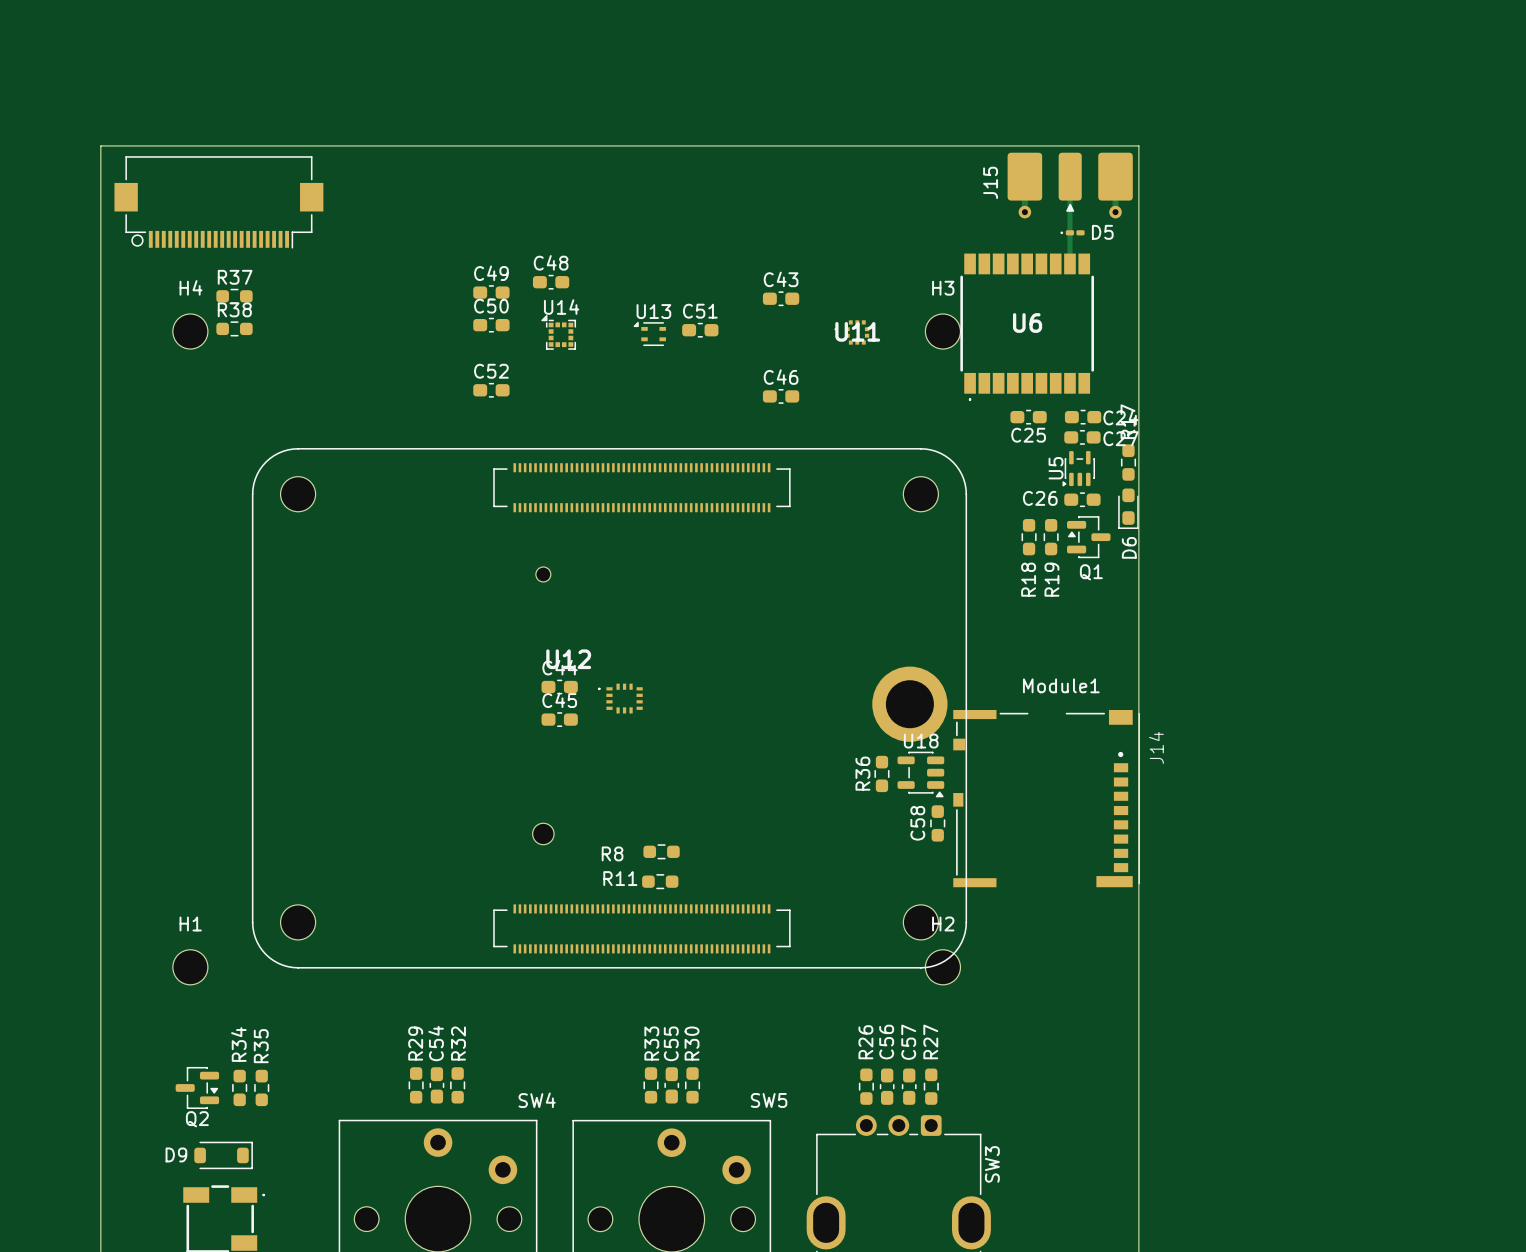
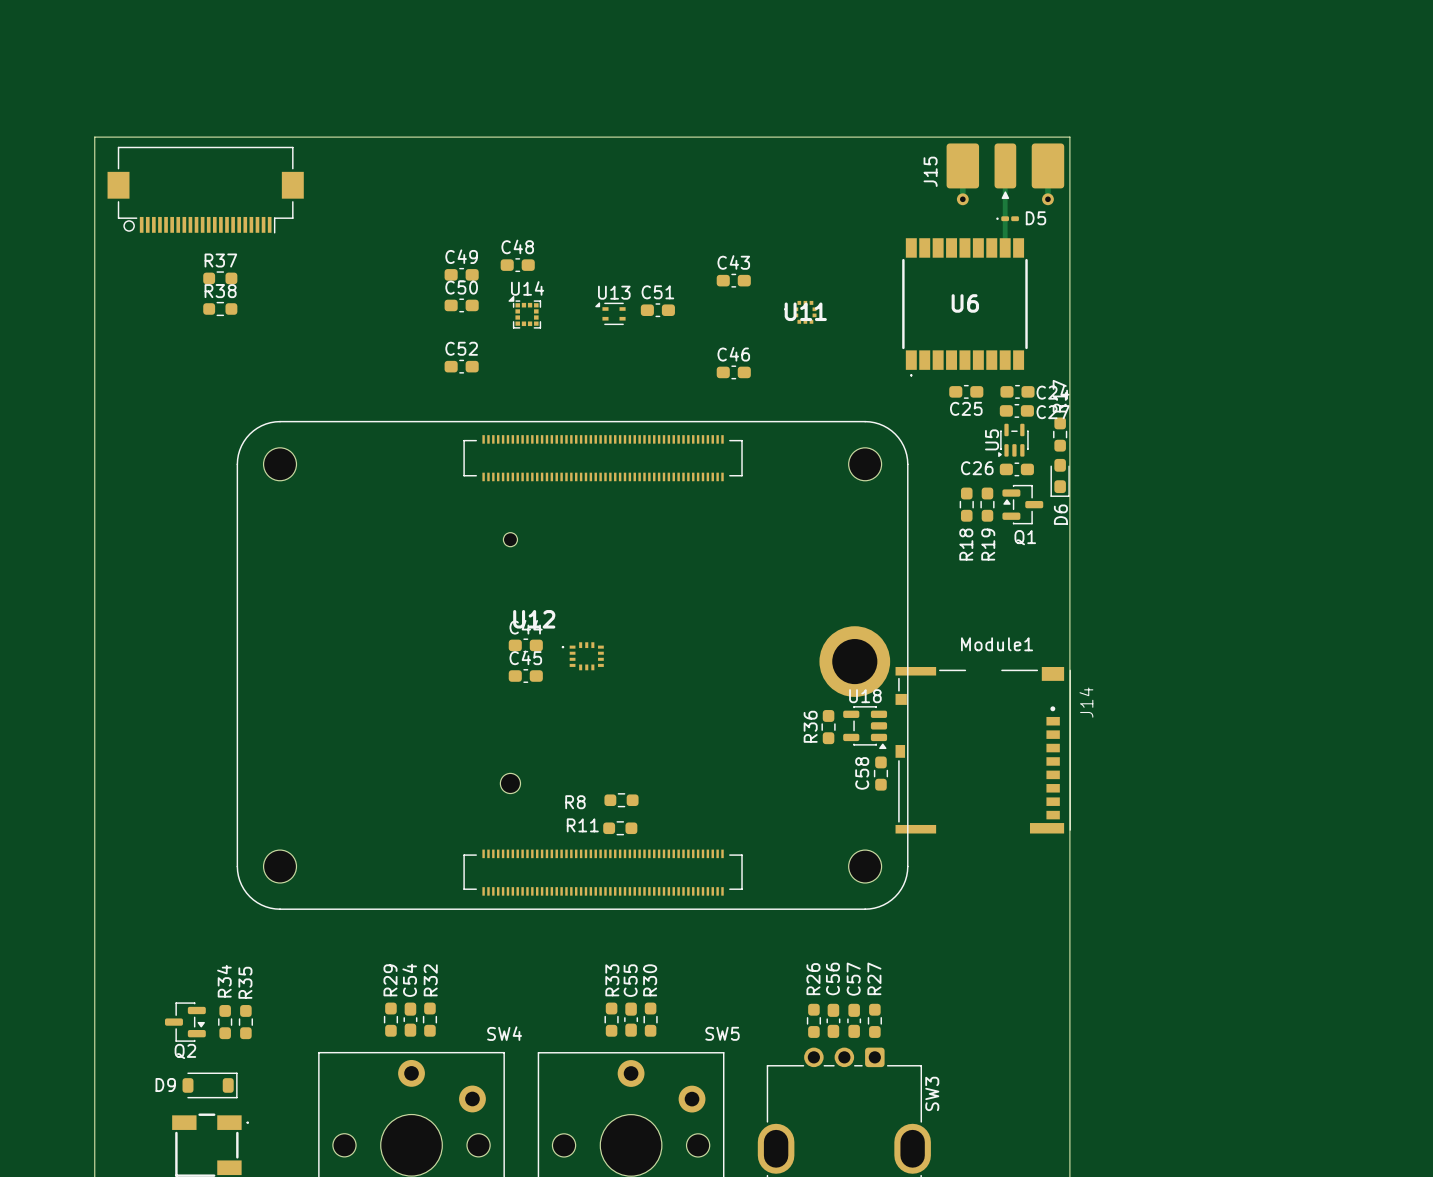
H4: (190, 331) -> none
H3: (942, 331) -> none
H1: (190, 967) -> none
H2: (942, 967) -> none

